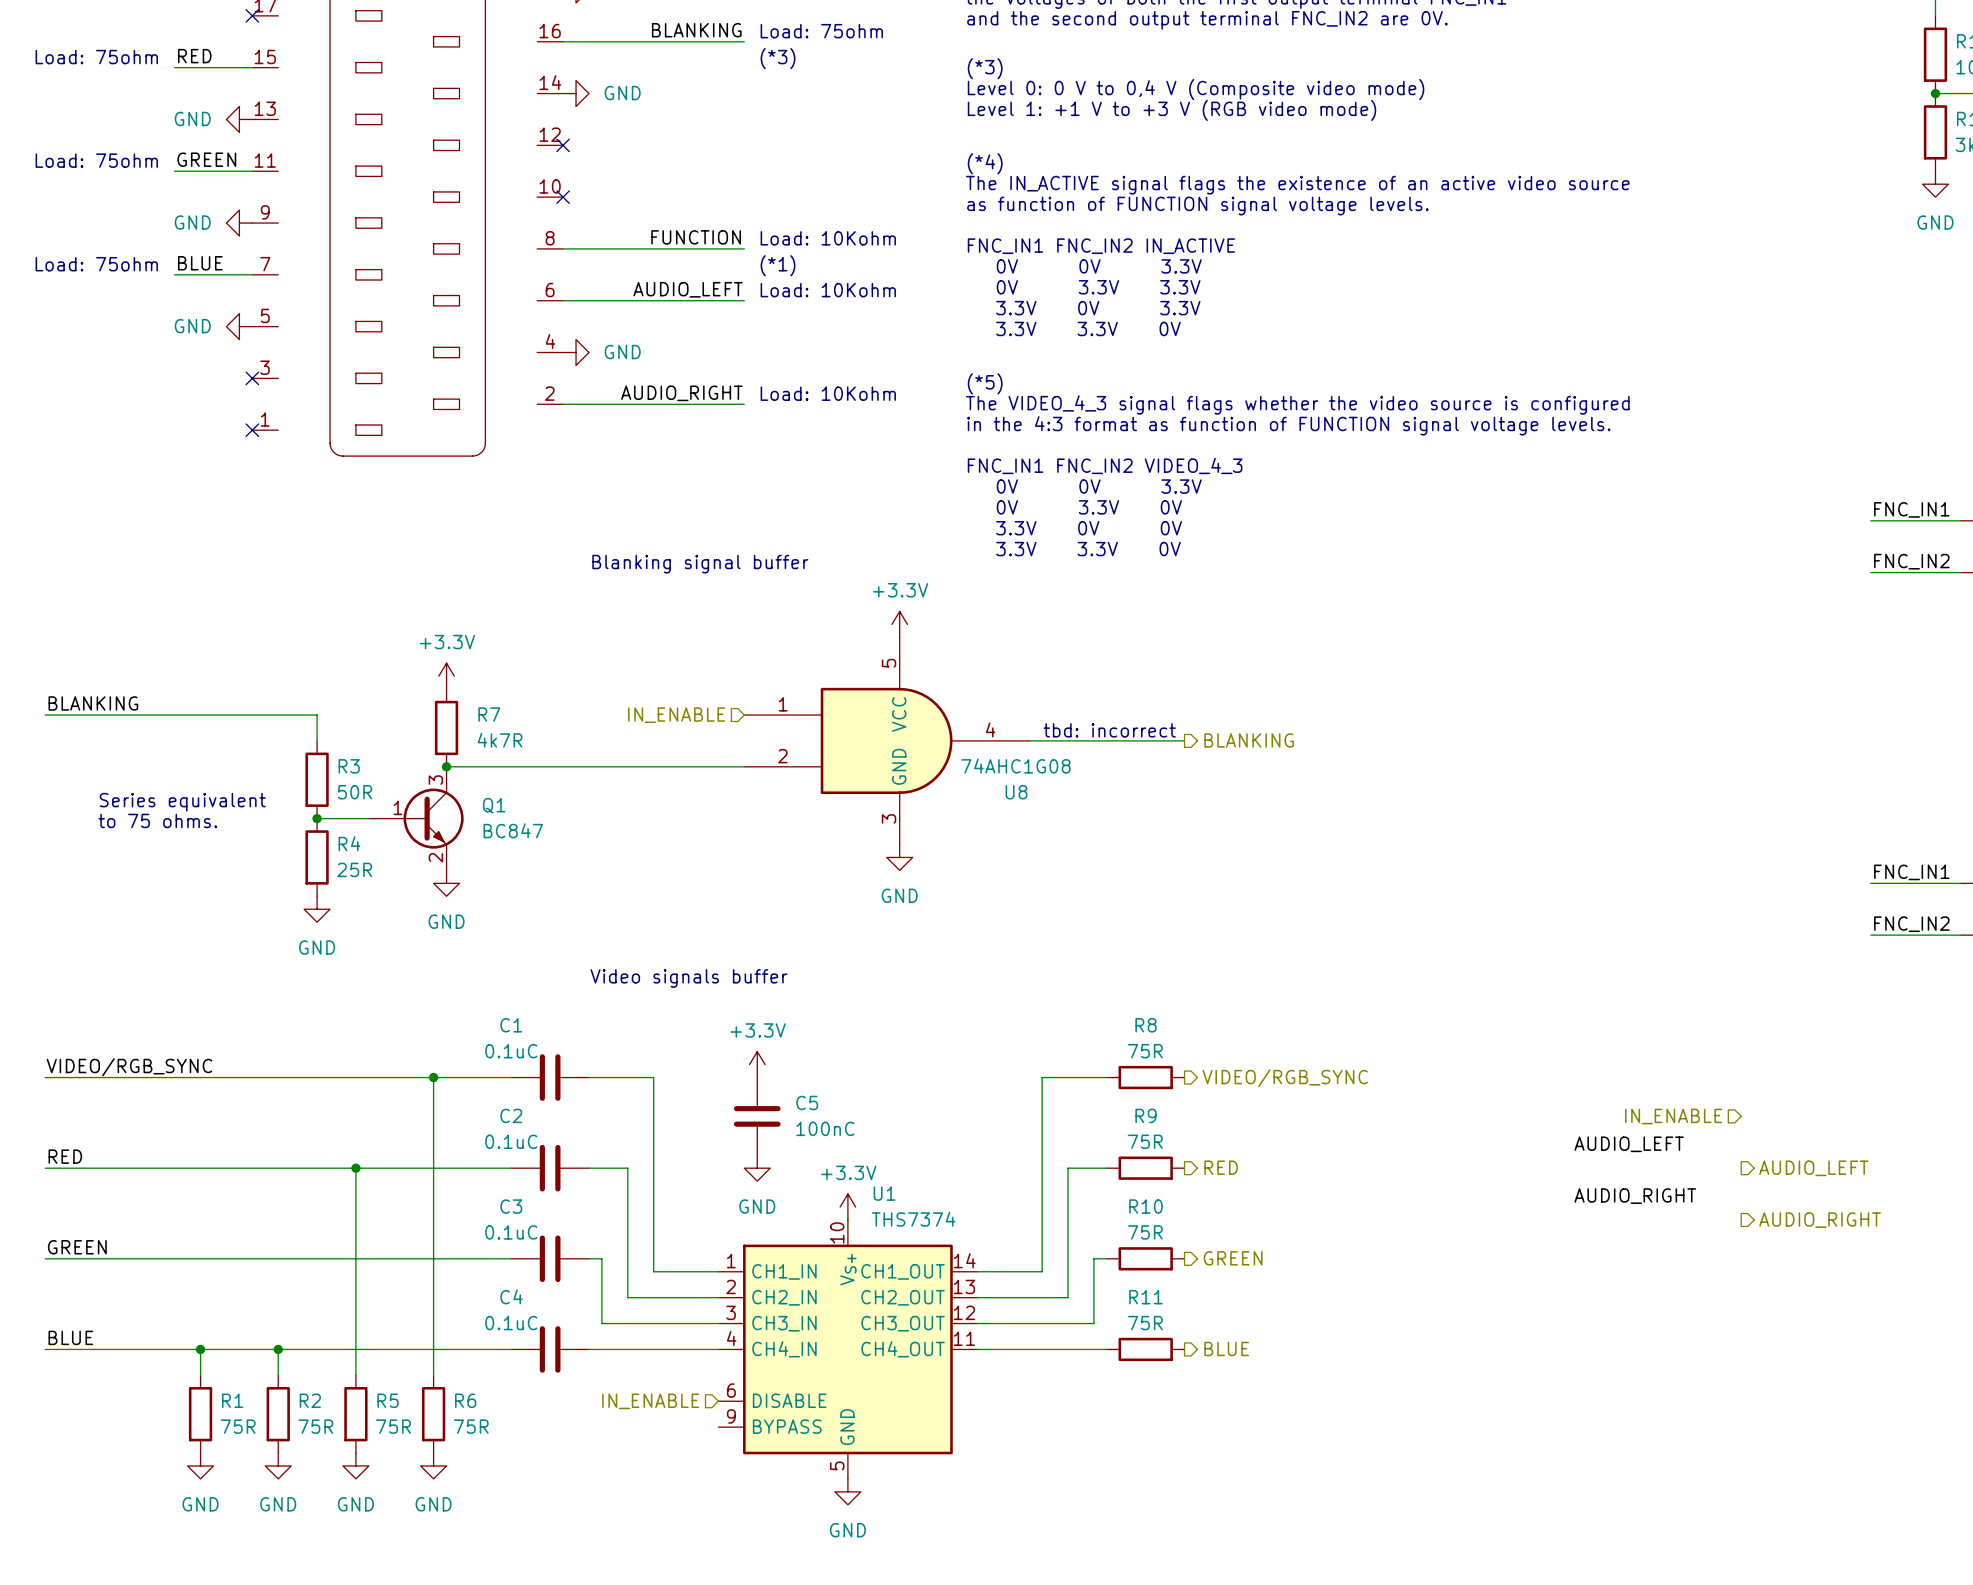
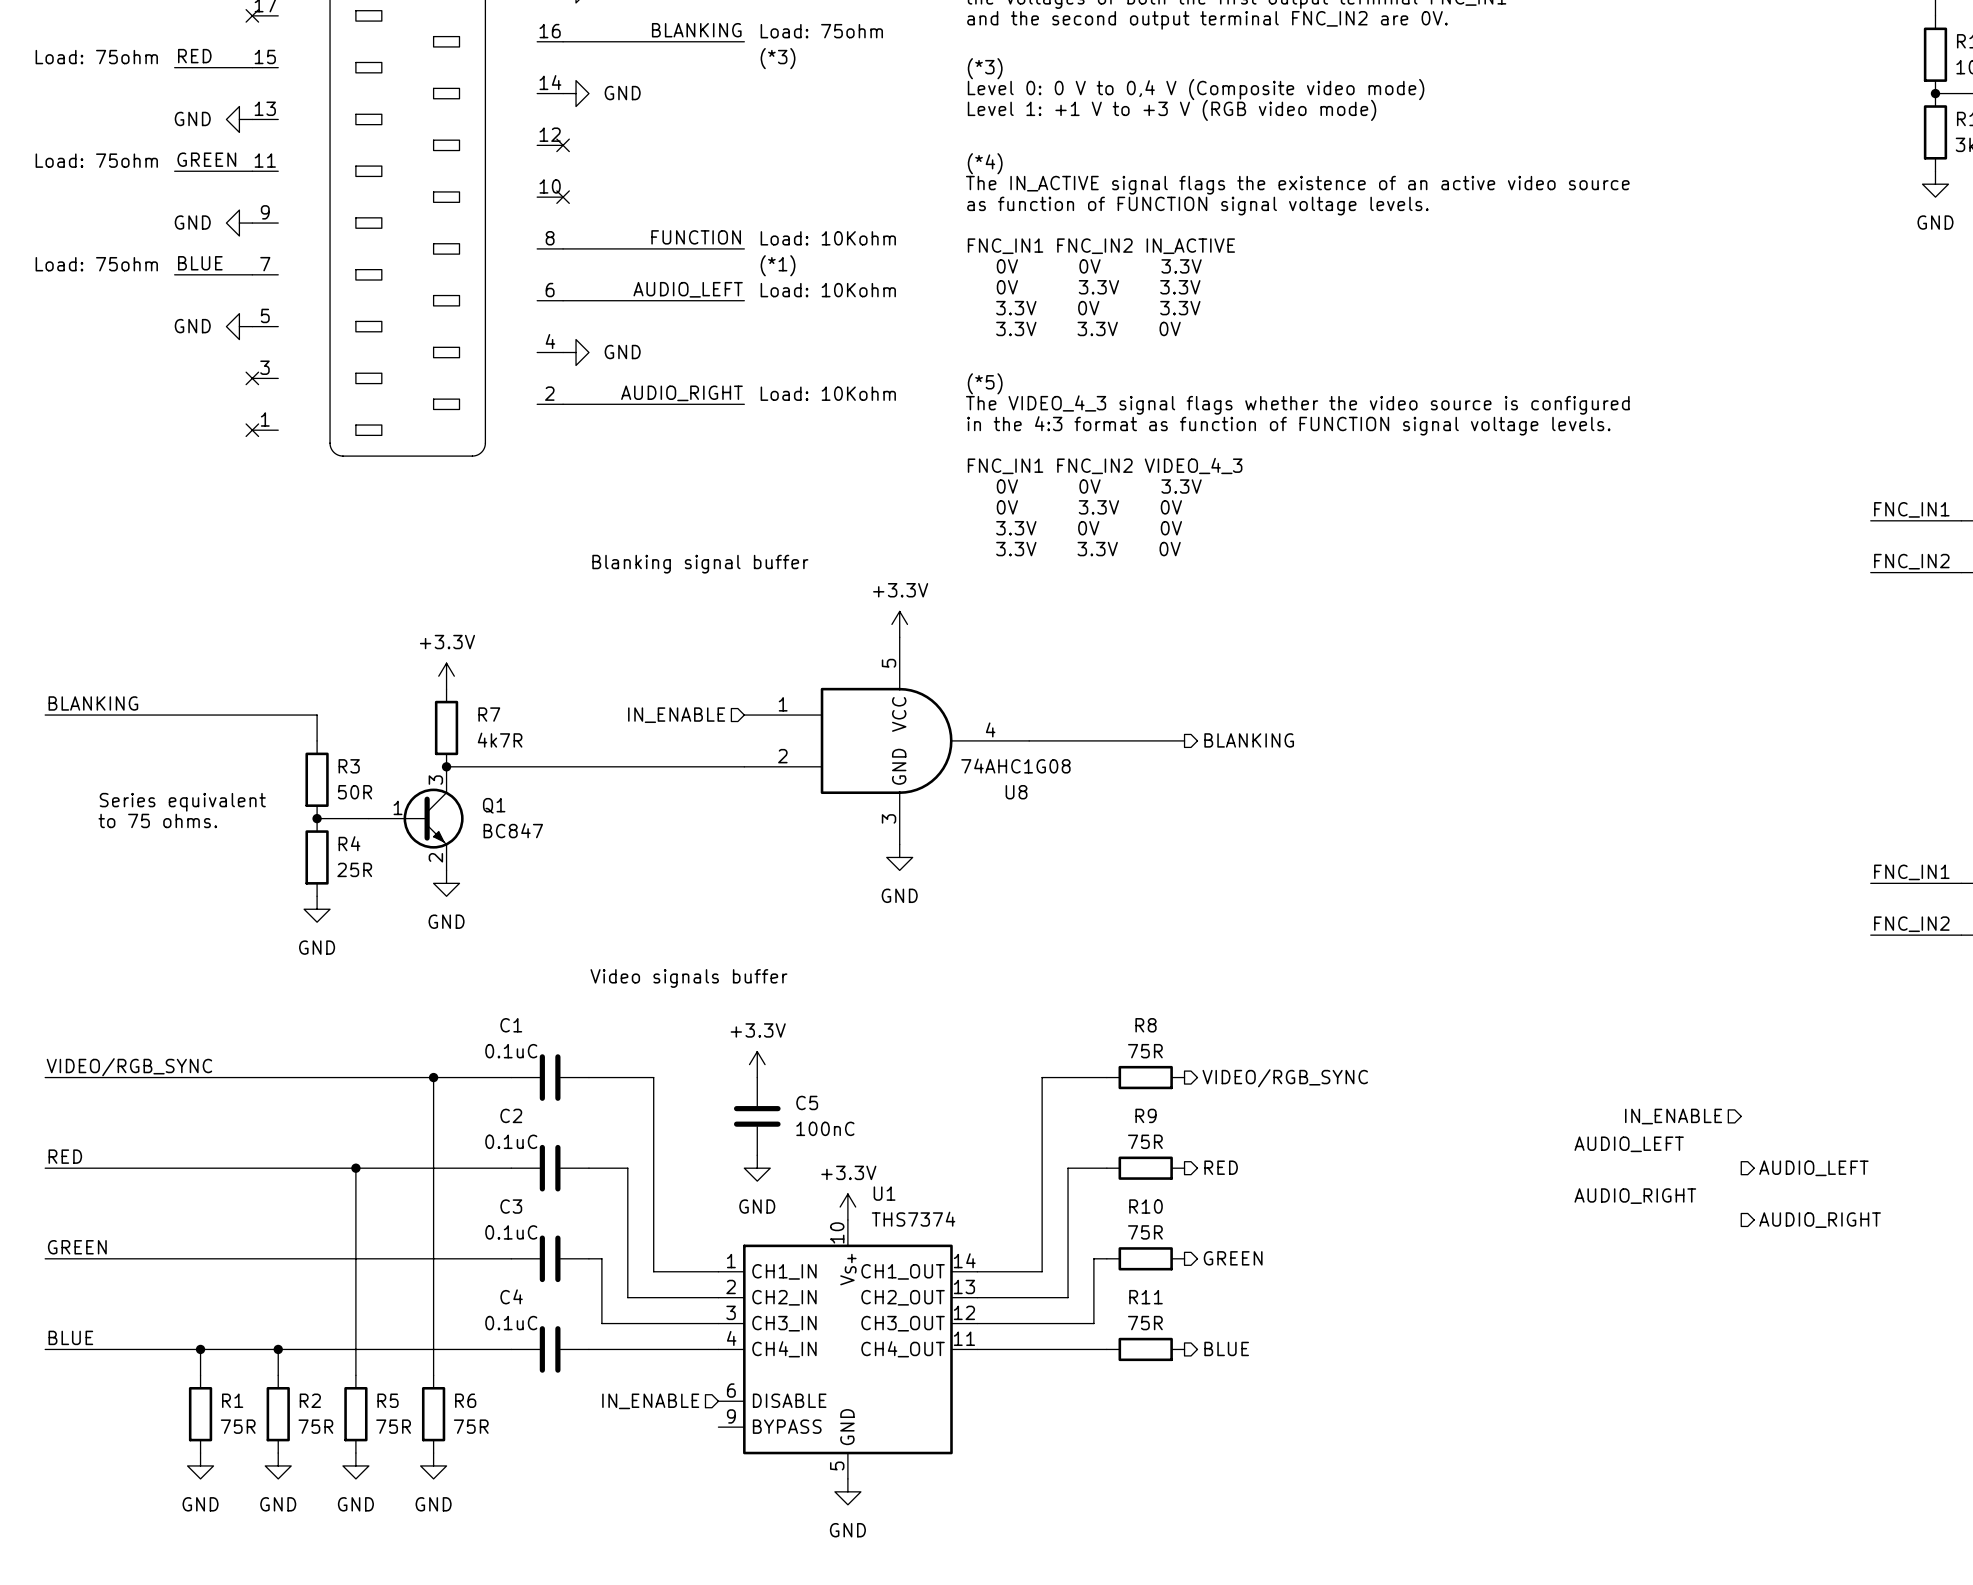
text: tbd: incorrect (1109, 730) -> none

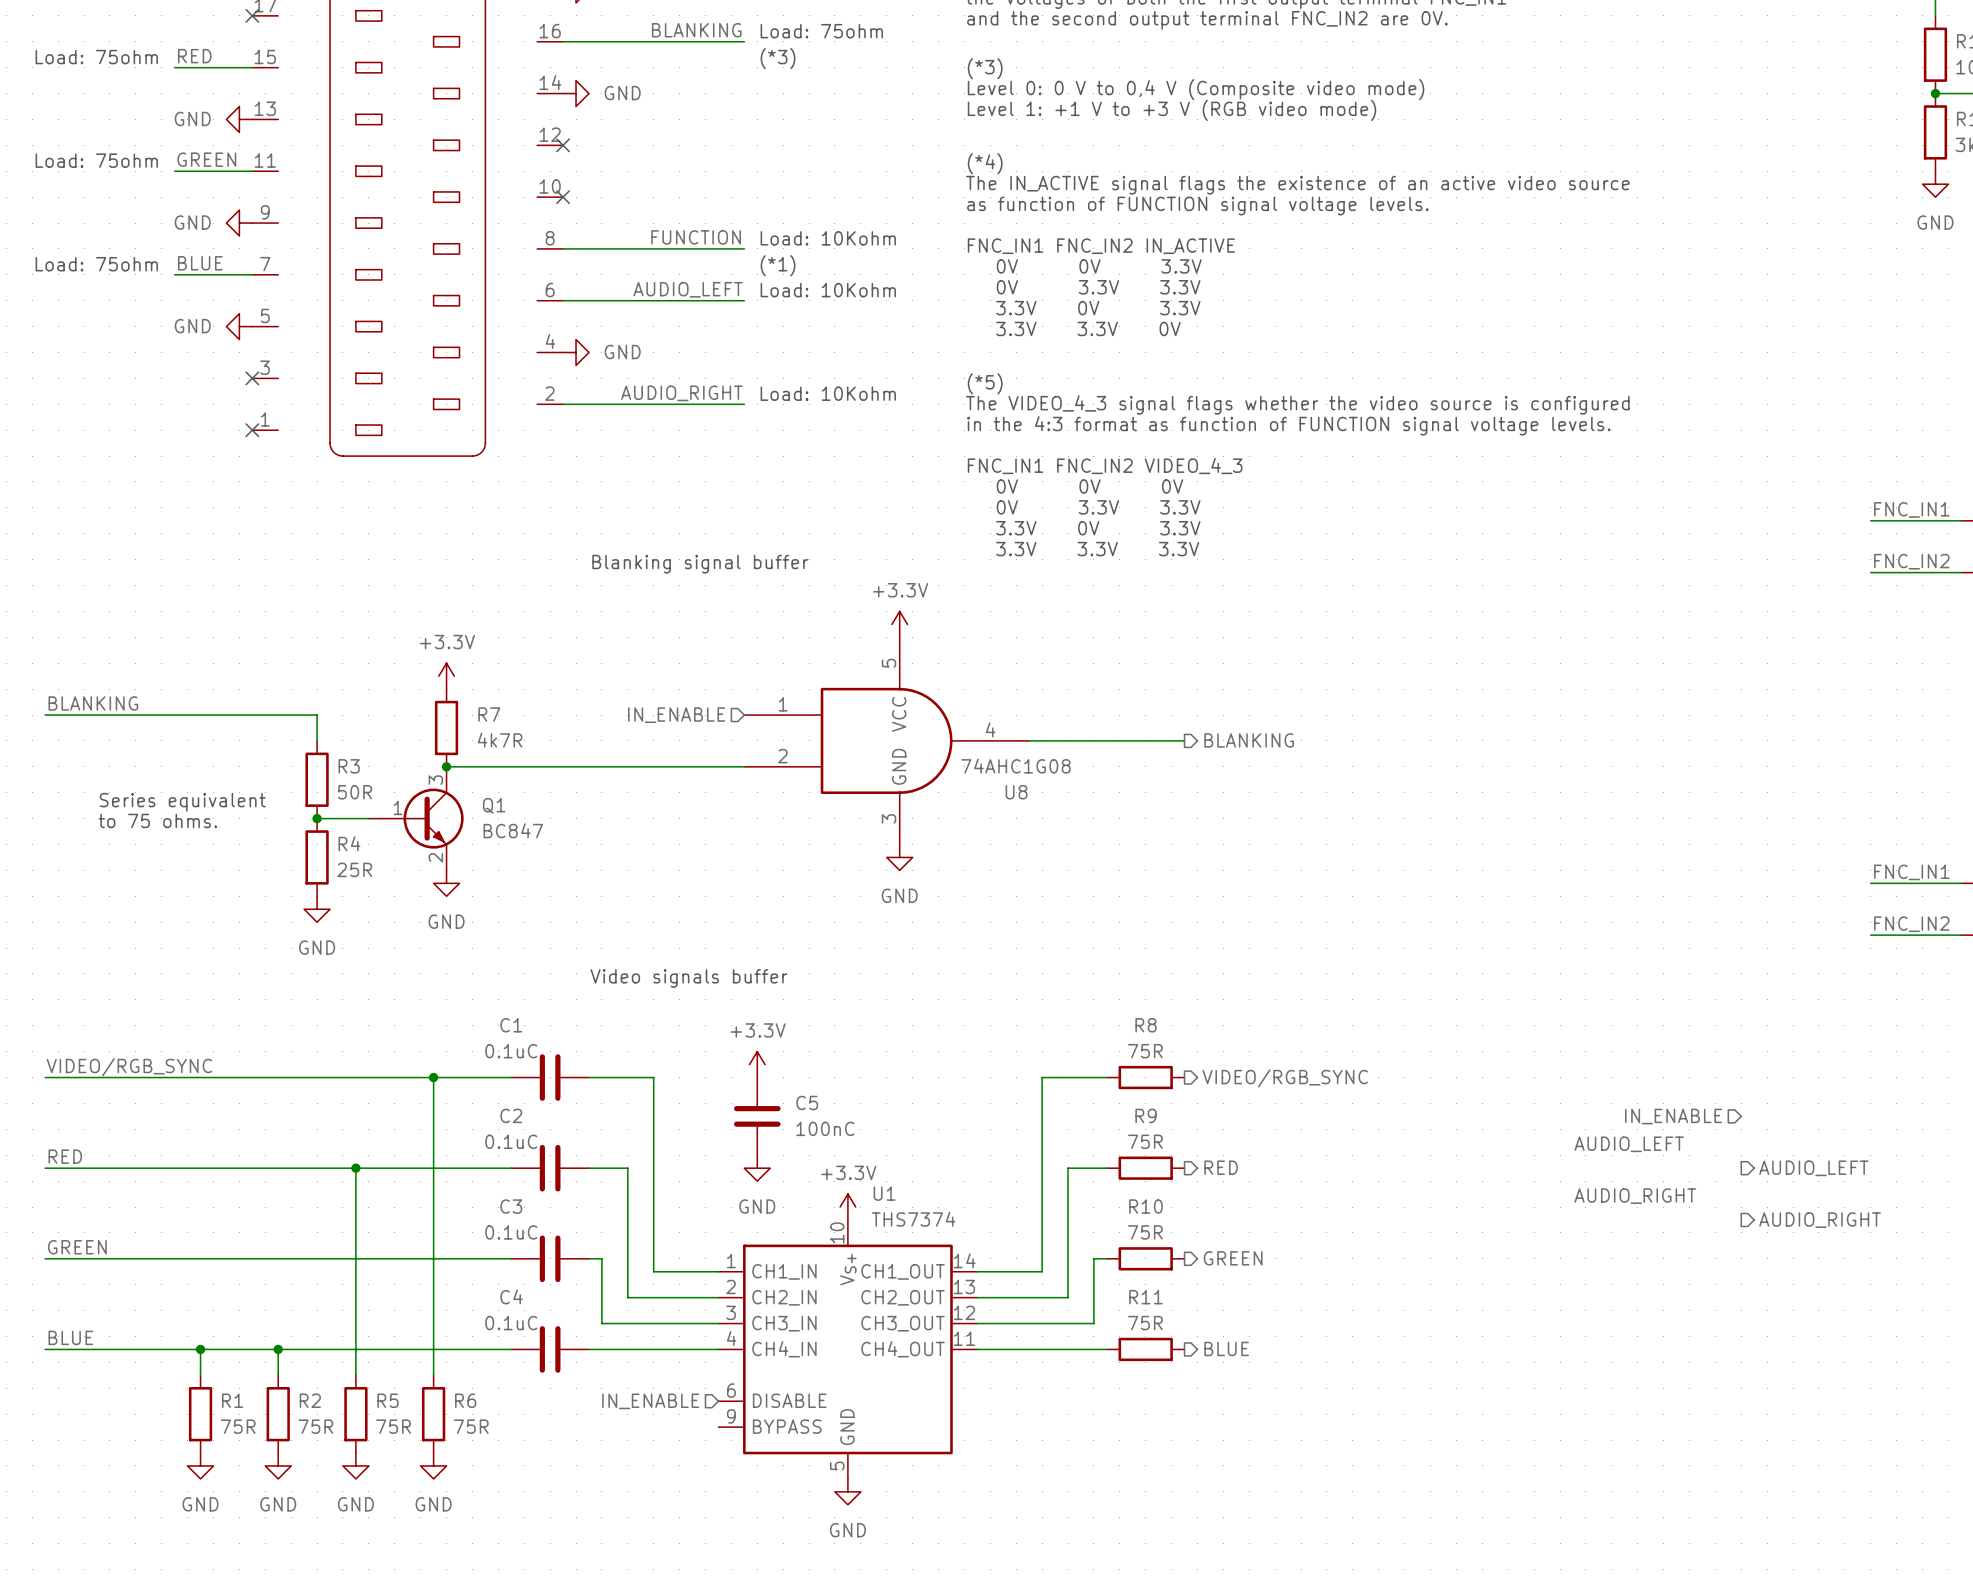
text: 0V 0V 3.3V (1099, 486) -> 0V 0V 0V (1090, 486)
text: 0V 3.3V 0V (1089, 507) -> 0V 3.3V 3.3V (1098, 507)
text: 3.3V 0V 0V (1089, 528) -> 3.3V 0V 3.3V (1098, 528)
text: 3.3V 3.3V 0V (1088, 549) -> 3.3V 3.3V 3.3V (1097, 549)

